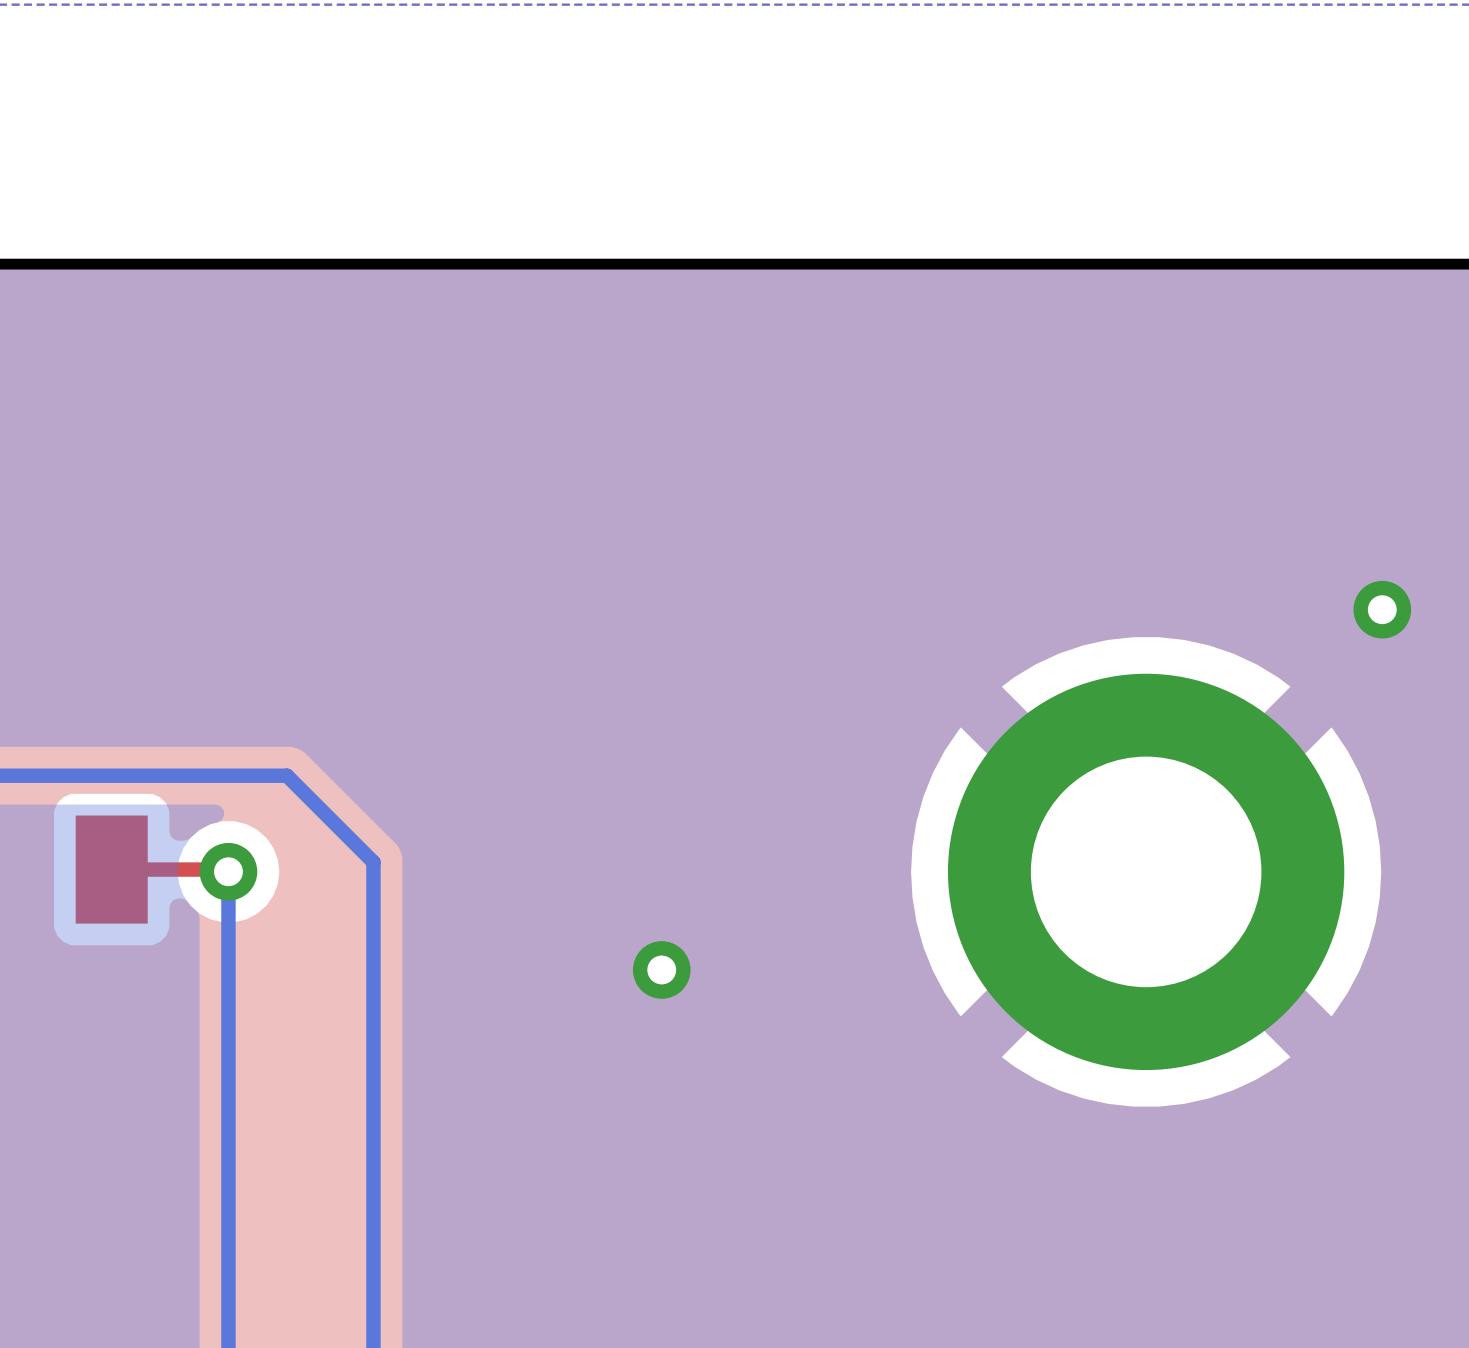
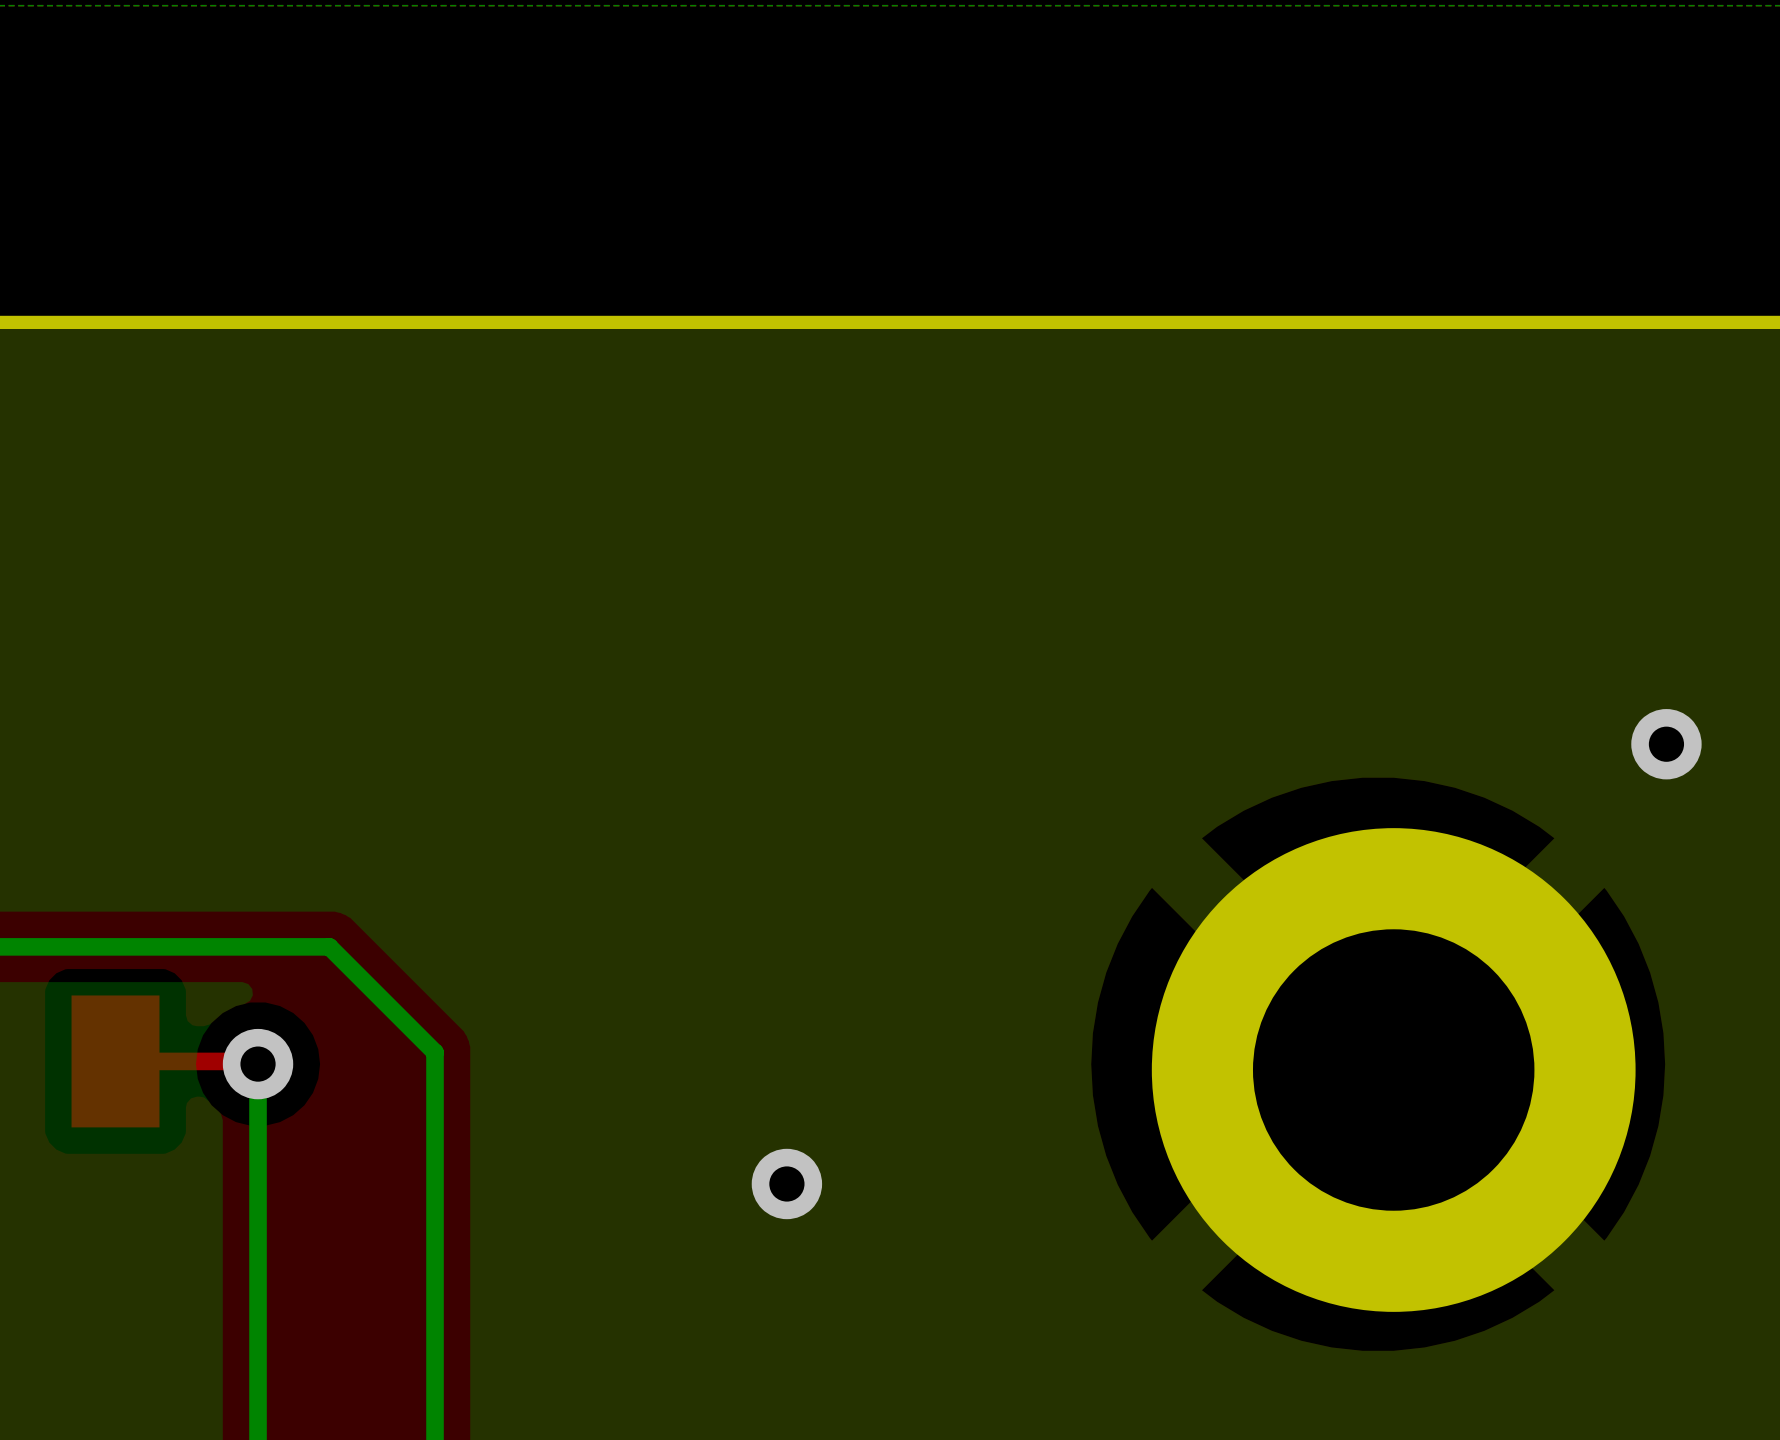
part position: (1146, 871) -> (1393, 1070)

